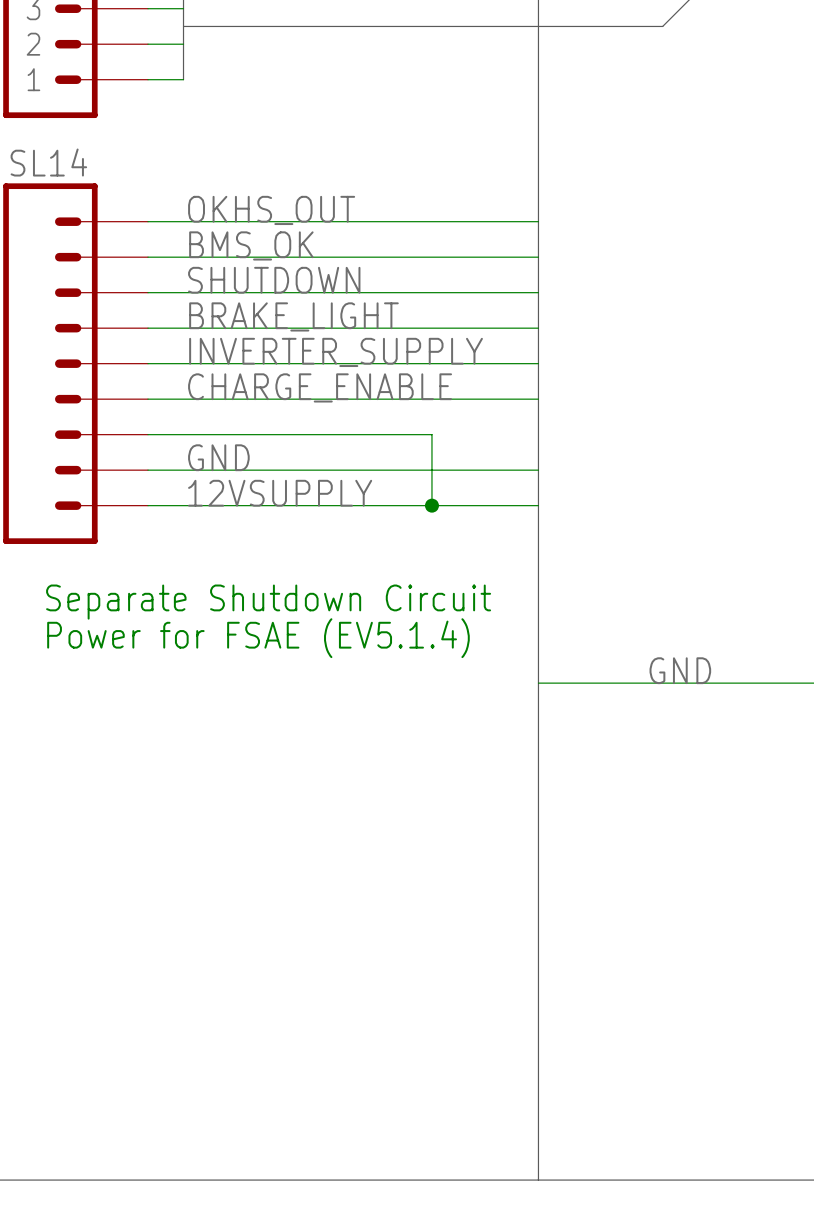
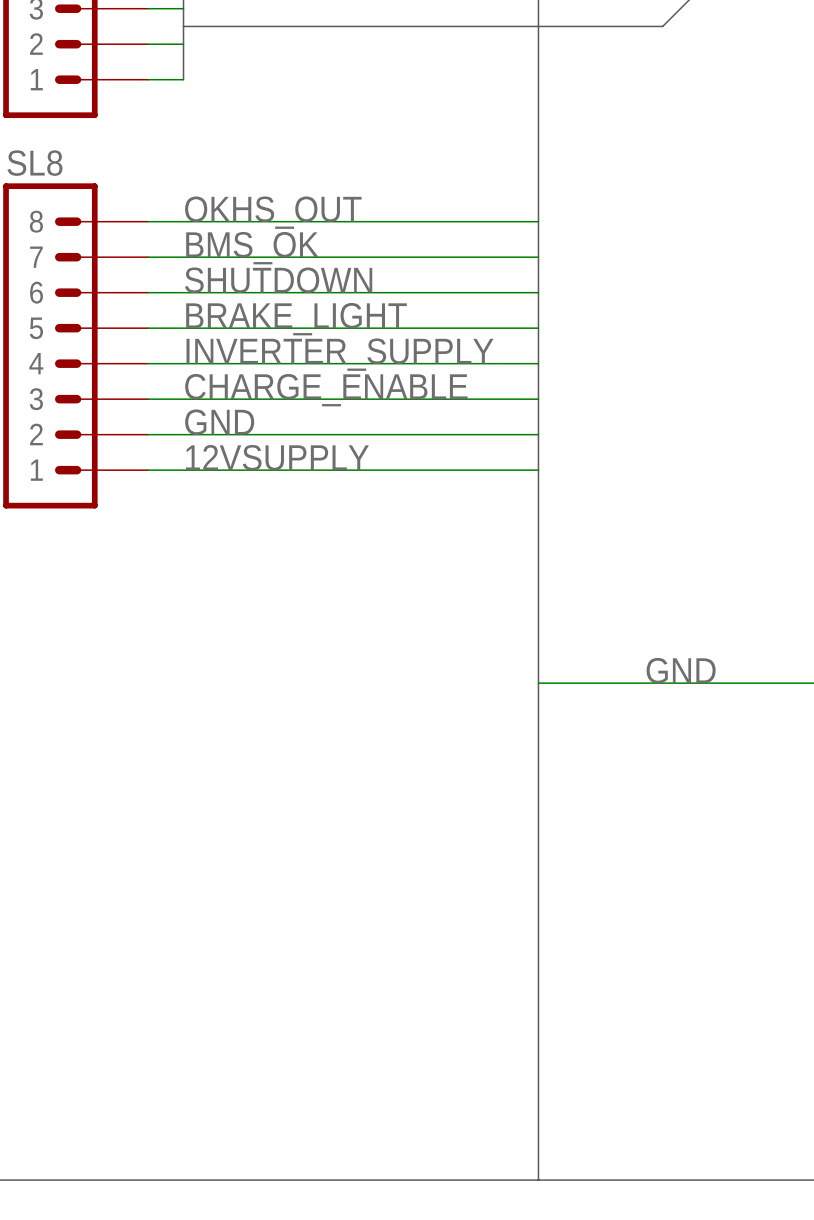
SL8: none -> (75, 345)
SL14: (75, 363) -> none
label: none -> GND (219, 422)
wire: (431, 434) (431, 505) -> (431, 434) (538, 434)
label: GND (218, 457) -> 12VSUPPLY (277, 457)
label: 12VSUPPLY (280, 493) -> none
wire: (148, 505) (538, 505) -> none
junction: (431, 505) -> none
text: Separate Shutdown Circuit (268, 602) -> none
text: Power for FSAE (EV5.1.4) (258, 638) -> none

